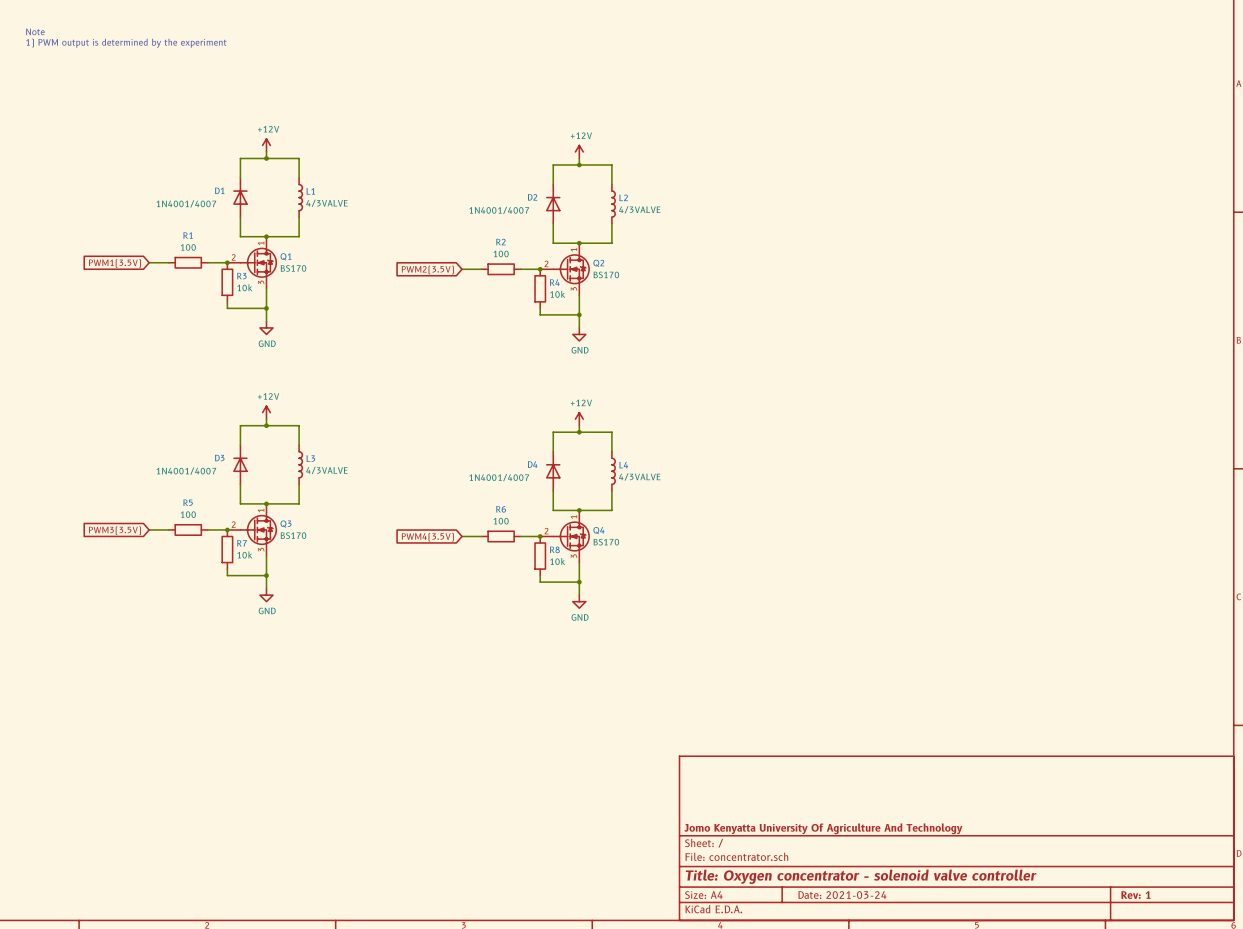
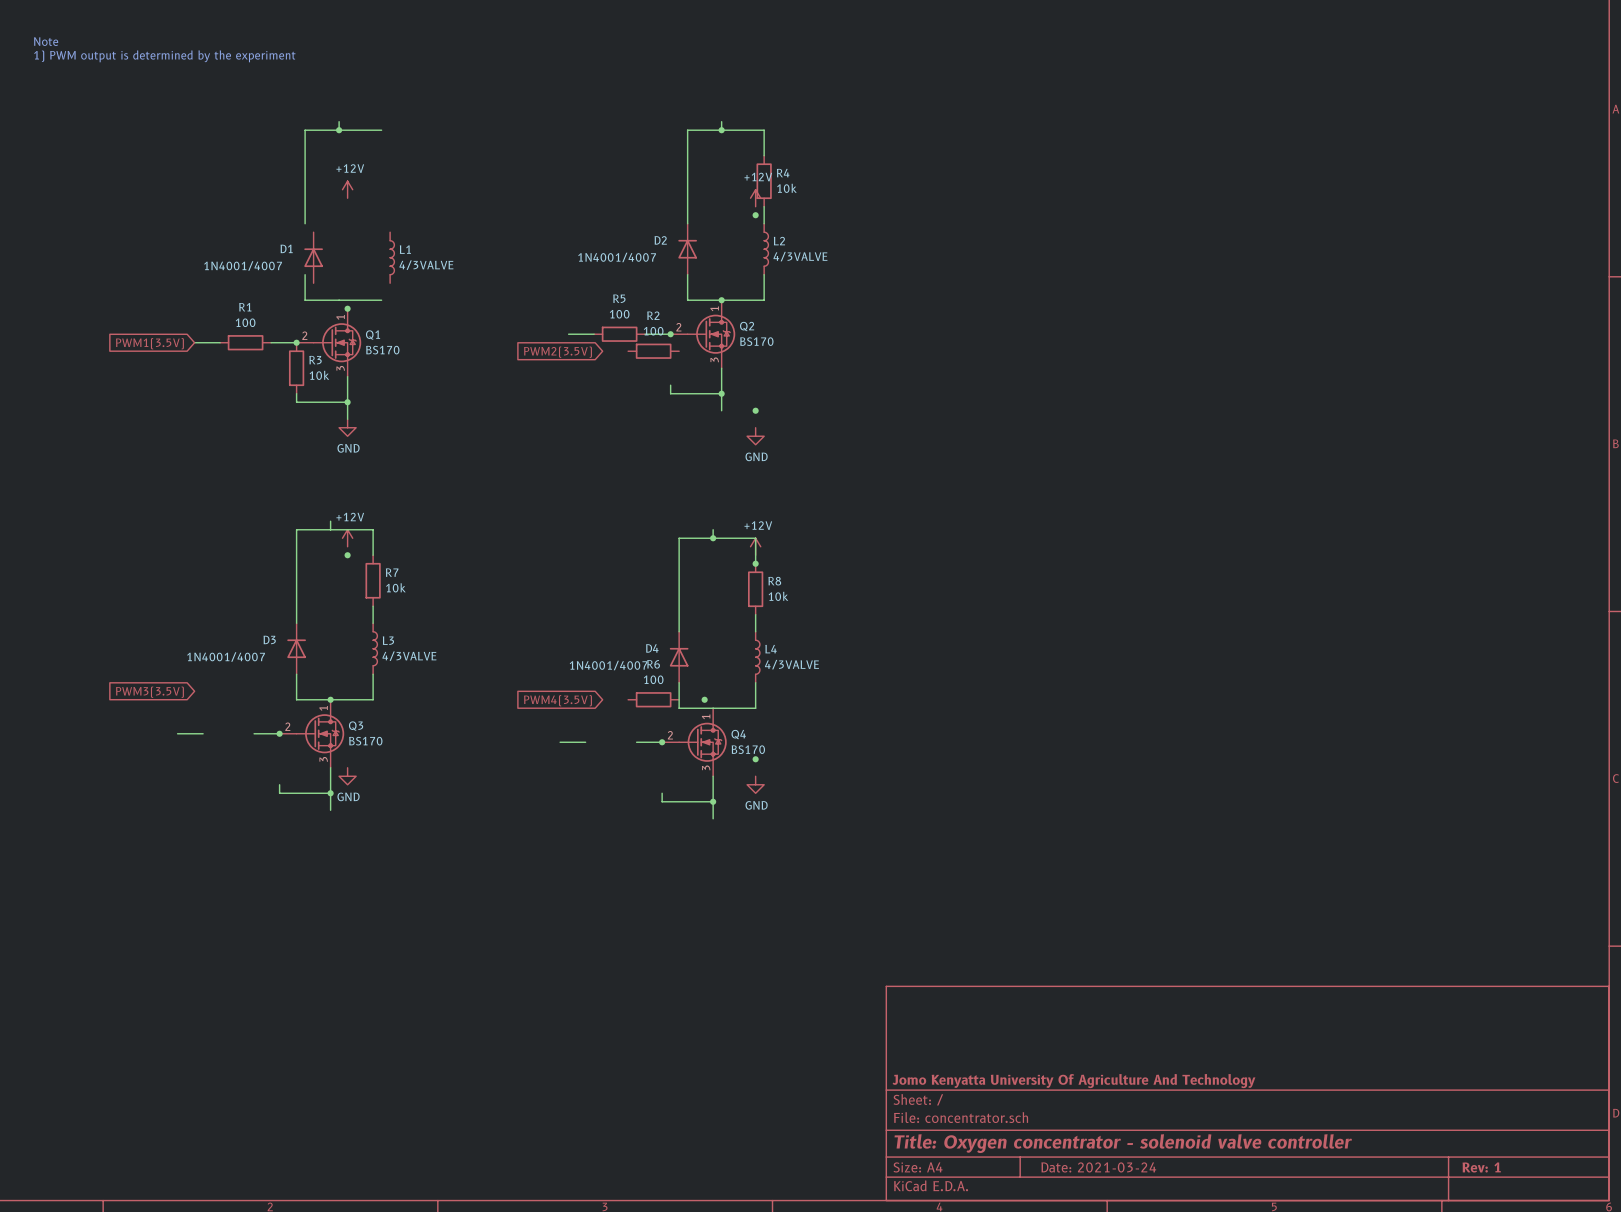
junction: none -> (339, 130)
wire: none -> (381, 130) (305, 130) (305, 223)
junction: none -> (721, 130)
wire: none -> (764, 155) (764, 130) (687, 130) (687, 223)
wire: (266, 151) (266, 158) -> (339, 121) (339, 130)
junction: (266, 158) -> none
wire: (579, 158) (579, 165) -> (721, 121) (721, 130)
wire: none -> (764, 206) (764, 223)
wire: (240, 178) (240, 158) (299, 158) (299, 178) -> none
wire: (553, 184) (553, 165) (611, 165) (611, 184) -> none
D2 position: (553, 204) -> (687, 249)
L2 position: (613, 204) -> (766, 249)
wire: none -> (305, 274) (305, 300) (381, 300)
wire: (240, 217) (240, 236) (299, 236) (299, 217) -> none
wire: (553, 223) (553, 243) (611, 243) (611, 223) -> (687, 274) (687, 300) (764, 300) (764, 274)
junction: none -> (721, 300)
junction: (579, 243) -> none
junction: none -> (670, 334)
wire: (462, 269) (481, 269) -> (568, 334) (594, 334)
wire: (520, 269) (540, 269) -> (645, 334) (670, 334)
junction: (540, 269) -> none
Q2 position: (564, 269) -> (702, 334)
R4 position: (540, 288) -> (764, 181)
wire: (579, 295) (579, 327) -> (721, 368) (721, 410)
junction: none -> (721, 393)
wire: (540, 308) (540, 314) (579, 314) -> (670, 385) (670, 393) (721, 393)
wire: none -> (713, 529) (713, 538)
junction: none -> (713, 538)
wire: (266, 419) (266, 425) -> (330, 521) (330, 529)
wire: none -> (373, 555) (373, 529) (296, 529) (296, 623)
wire: none -> (755, 555) (755, 538) (679, 538) (679, 631)
wire: (240, 445) (240, 425) (299, 425) (299, 445) -> none
wire: (553, 451) (553, 432) (611, 432) (611, 451) -> none
D3 position: (240, 464) -> (296, 648)
wire: none -> (373, 606) (373, 623)
L3 position: (300, 464) -> (375, 648)
D4 position: (553, 471) -> (679, 657)
wire: none -> (755, 614) (755, 631)
L4 position: (613, 471) -> (757, 657)
wire: (240, 484) (240, 503) (299, 503) (299, 484) -> (296, 674) (296, 699) (373, 699) (373, 674)
wire: (553, 490) (553, 510) (611, 510) (611, 490) -> (679, 682) (679, 708) (755, 708) (755, 682)
junction: (266, 503) -> none
junction: (579, 510) -> none
wire: (149, 529) (168, 529) -> (177, 733) (203, 733)
R5 position: (188, 529) -> (619, 334)
wire: (207, 529) (227, 529) -> (254, 733) (279, 733)
junction: (227, 529) -> none
Q3 position: (252, 529) -> (311, 733)
junction: none -> (330, 699)
wire: (462, 536) (481, 536) -> (560, 742) (585, 742)
wire: (520, 536) (540, 536) -> (636, 742) (662, 742)
Q4 position: (564, 536) -> (694, 742)
R7 position: (227, 549) -> (373, 580)
wire: (266, 556) (266, 588) -> (330, 767) (330, 810)
R8 position: (540, 556) -> (755, 589)
junction: none -> (279, 733)
wire: (579, 562) (579, 595) -> (713, 776) (713, 818)
wire: (227, 569) (227, 575) (266, 575) -> (279, 784) (279, 793) (330, 793)
junction: none -> (662, 742)
junction: (266, 575) -> none
wire: (540, 575) (540, 582) (579, 582) -> (662, 793) (662, 801) (713, 801)
junction: none -> (330, 793)
junction: none -> (713, 801)

